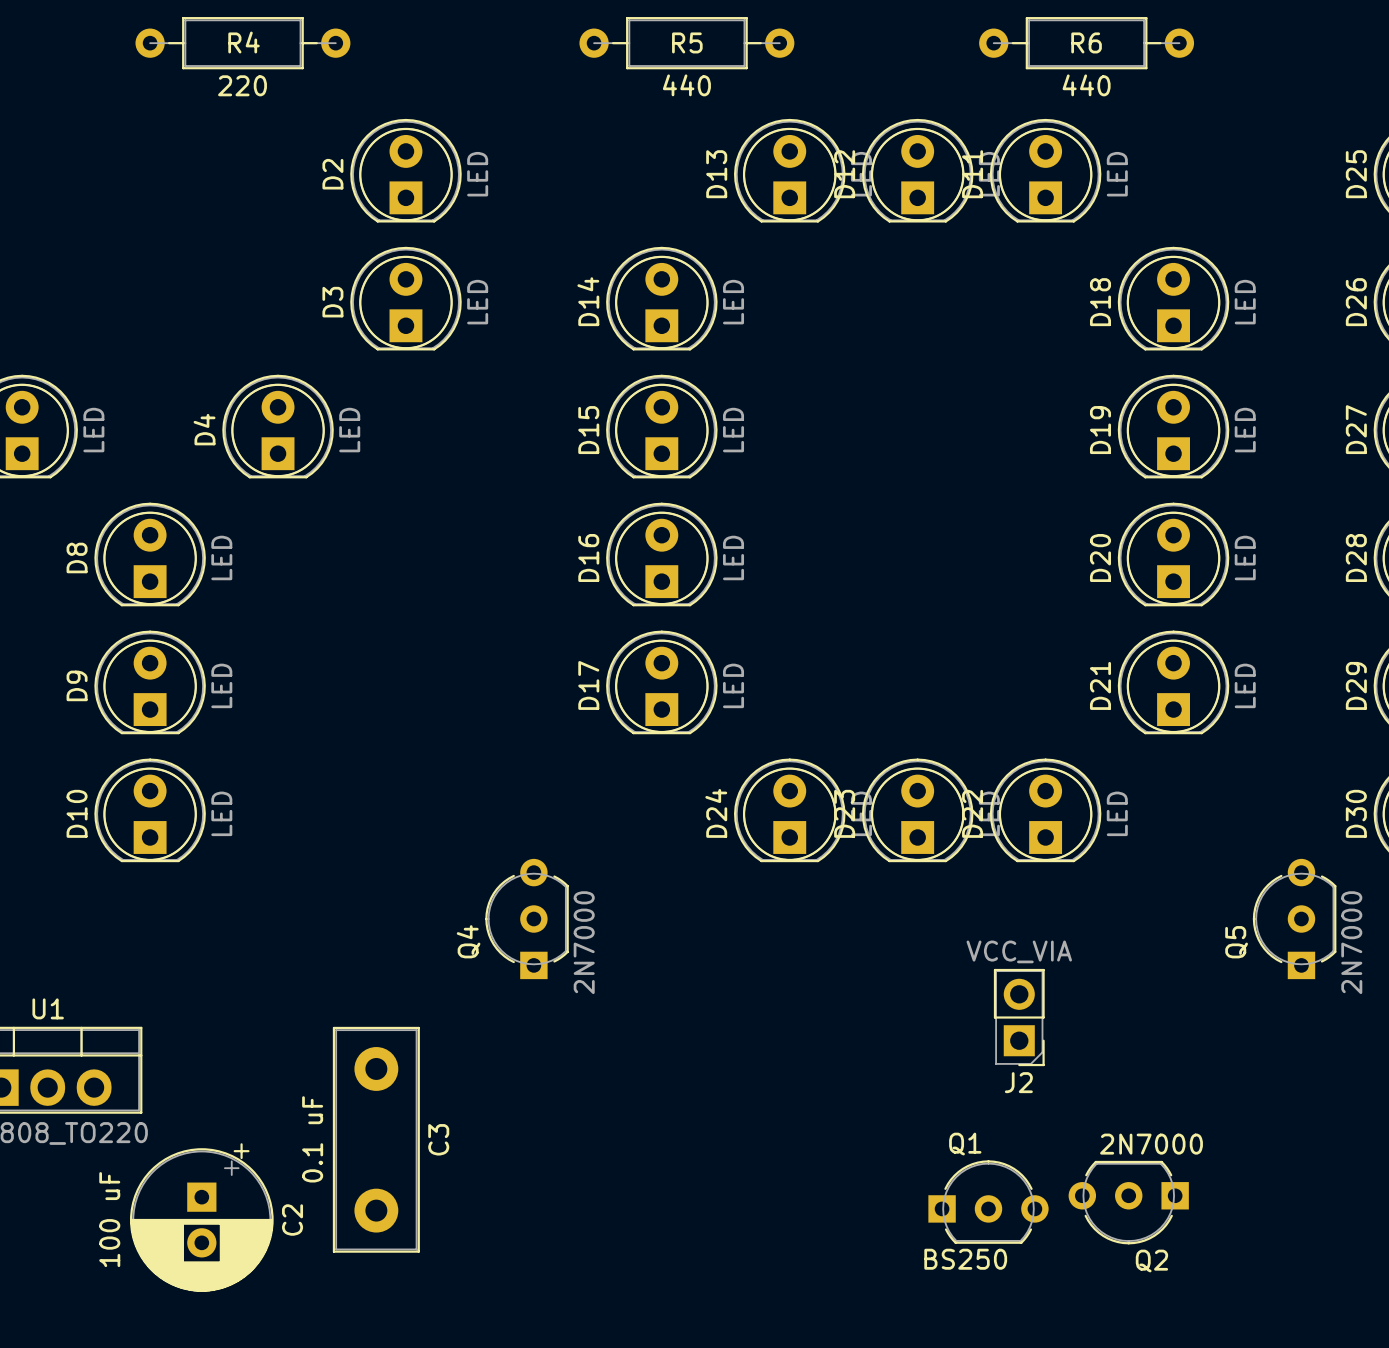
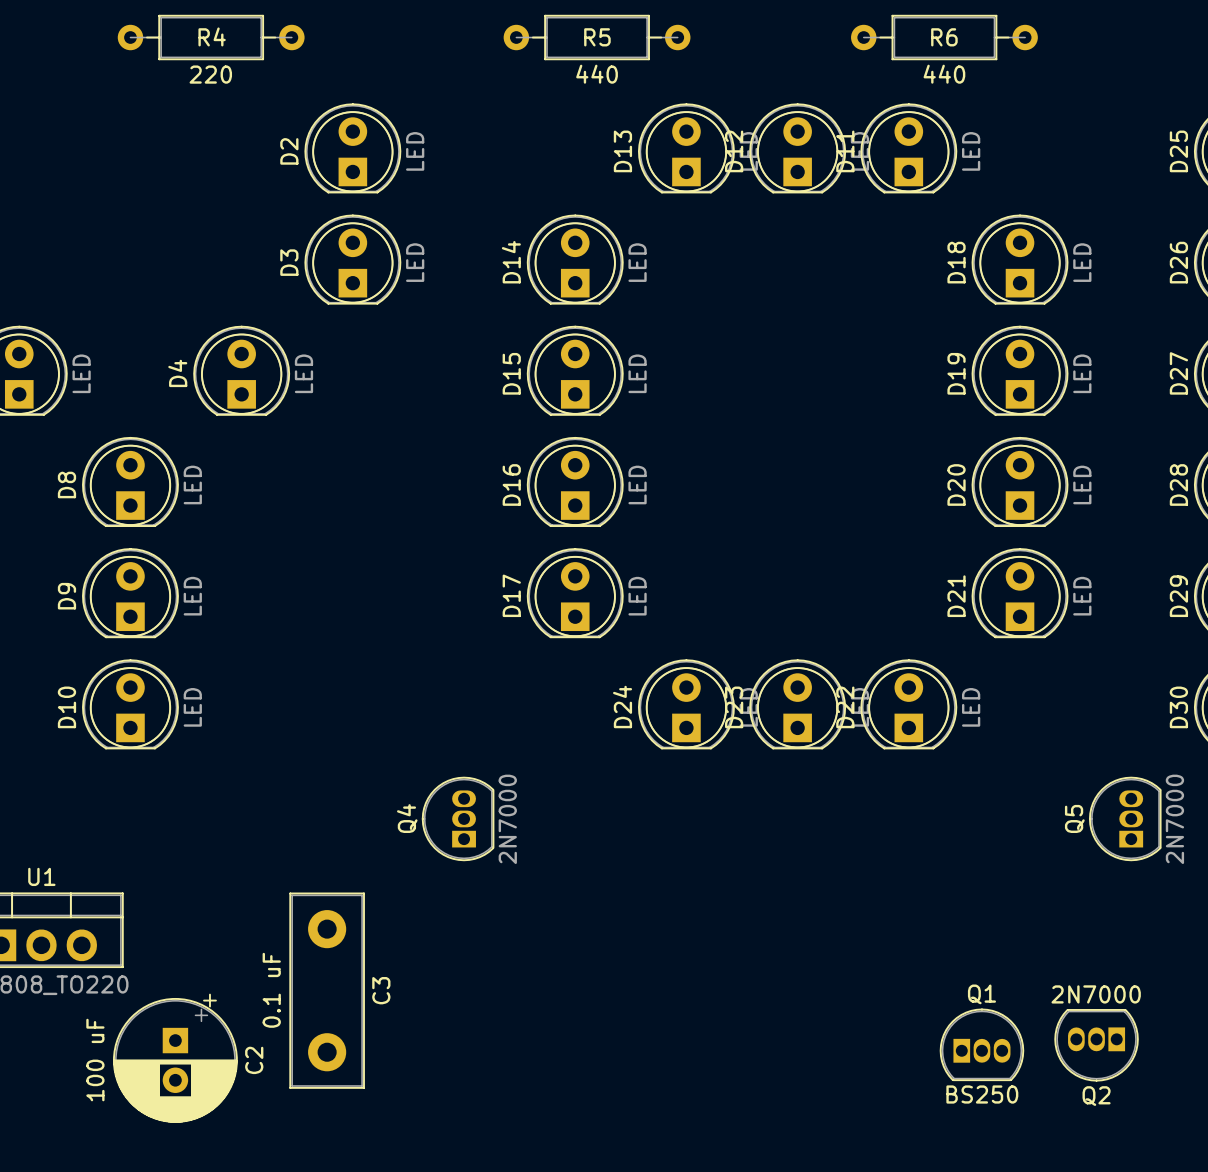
Q4 footprint: [485, 858, 569, 980] -> [421, 776, 495, 862]
Q5 footprint: [1252, 858, 1337, 980] -> [1088, 776, 1162, 862]
J2: VCC_VIA (1019, 1017) -> none
Q1 footprint: [928, 1160, 1049, 1244] -> [939, 1008, 1025, 1082]
Q2 footprint: [1068, 1160, 1189, 1245] -> [1054, 1009, 1139, 1082]

